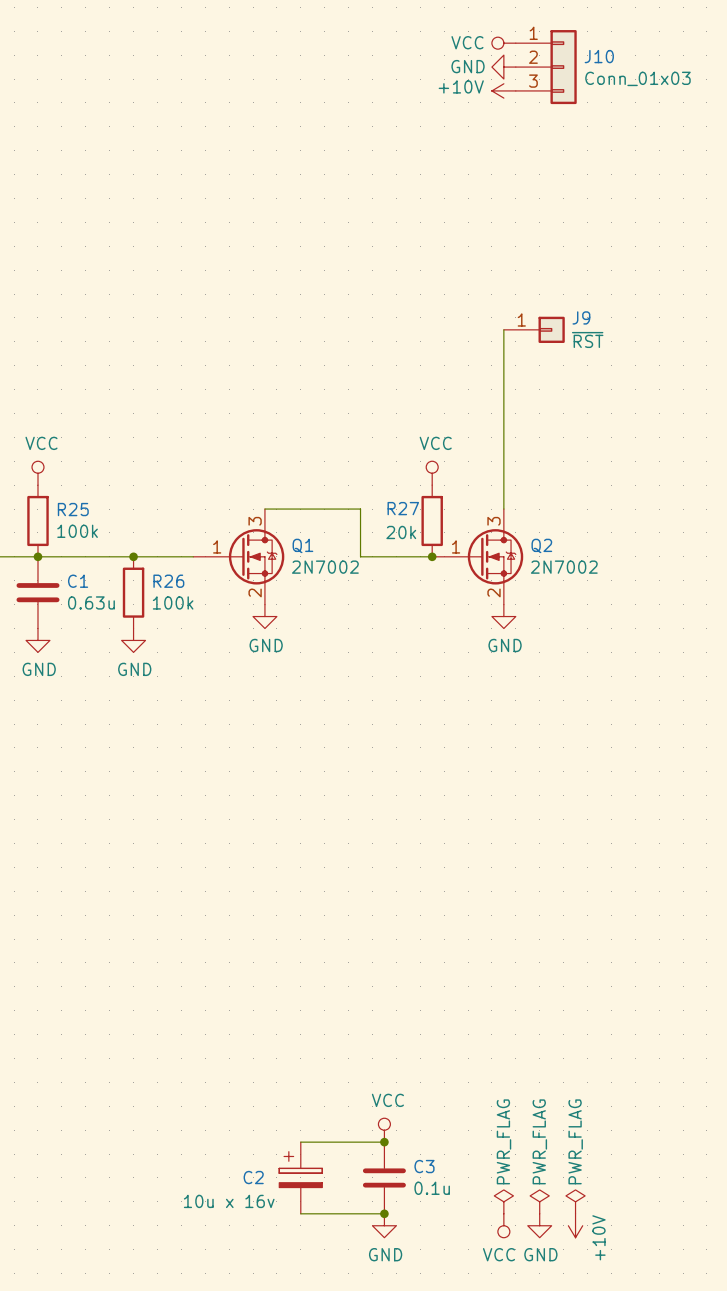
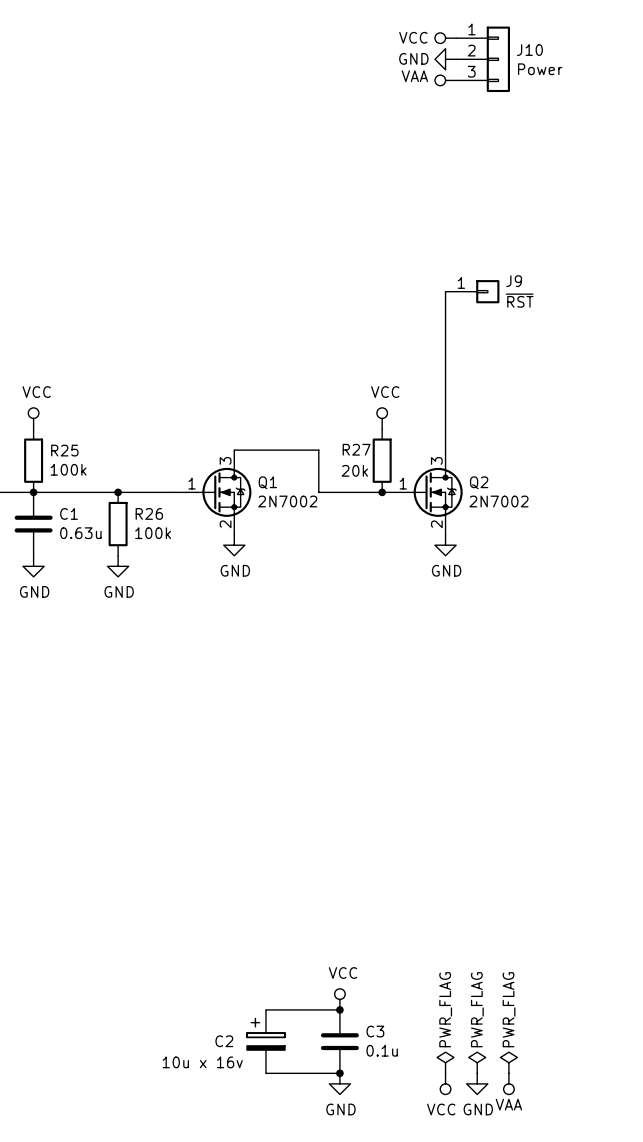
J10 value: Conn_01x03 (637, 78) -> Power (540, 69)
power symbol: +10V (503, 90) -> VAA (445, 80)
power symbol: +10V (575, 1225) -> VAA (508, 1083)

